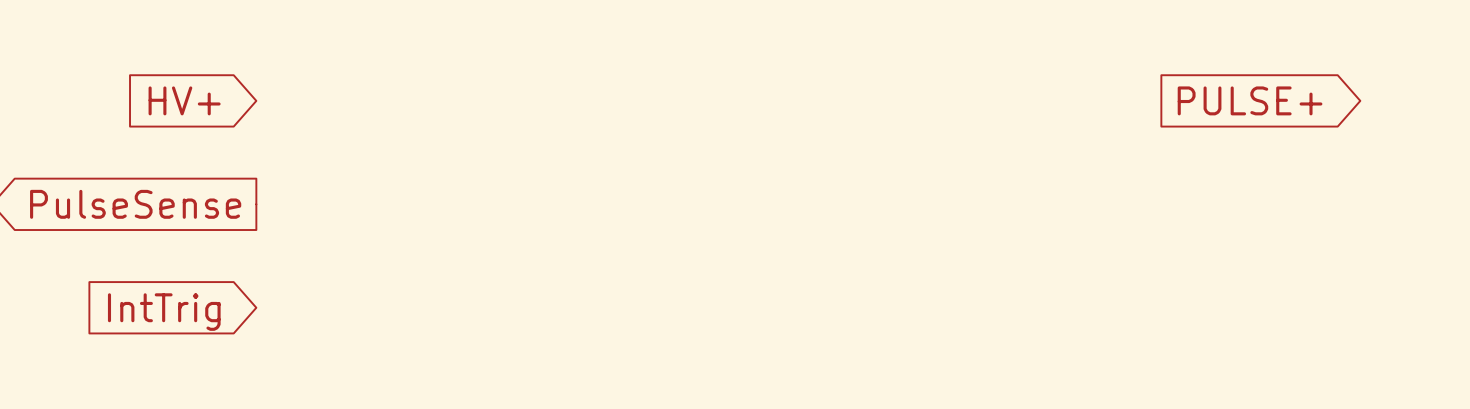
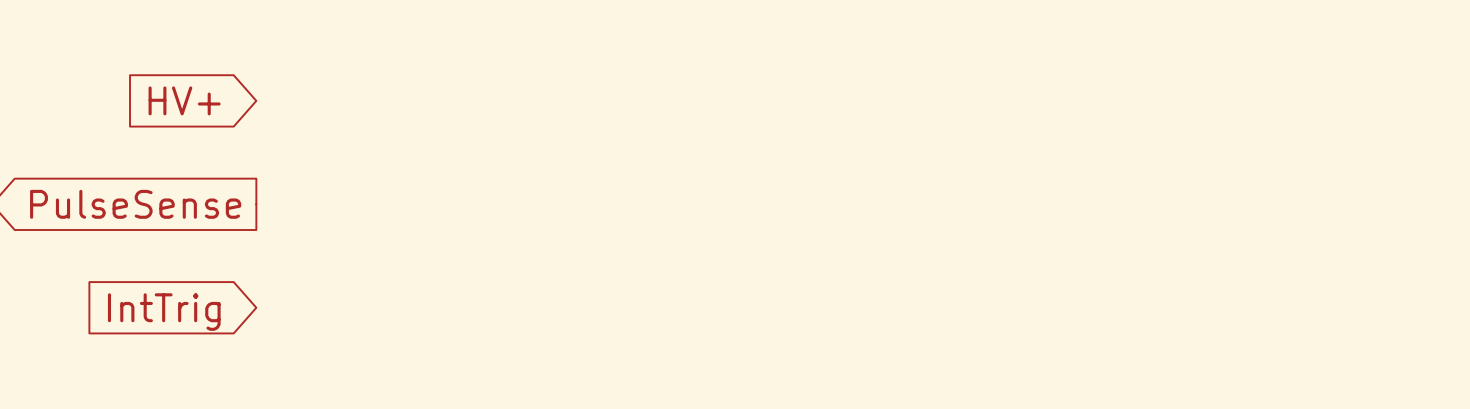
global label: PULSE+ (1250, 100) -> none

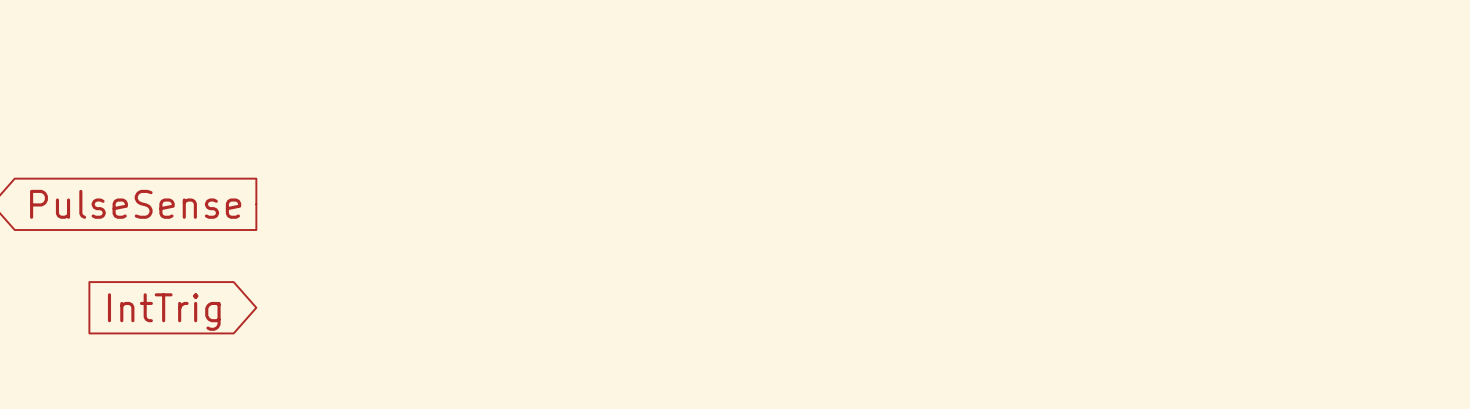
global label: HV+ (184, 100) -> none

